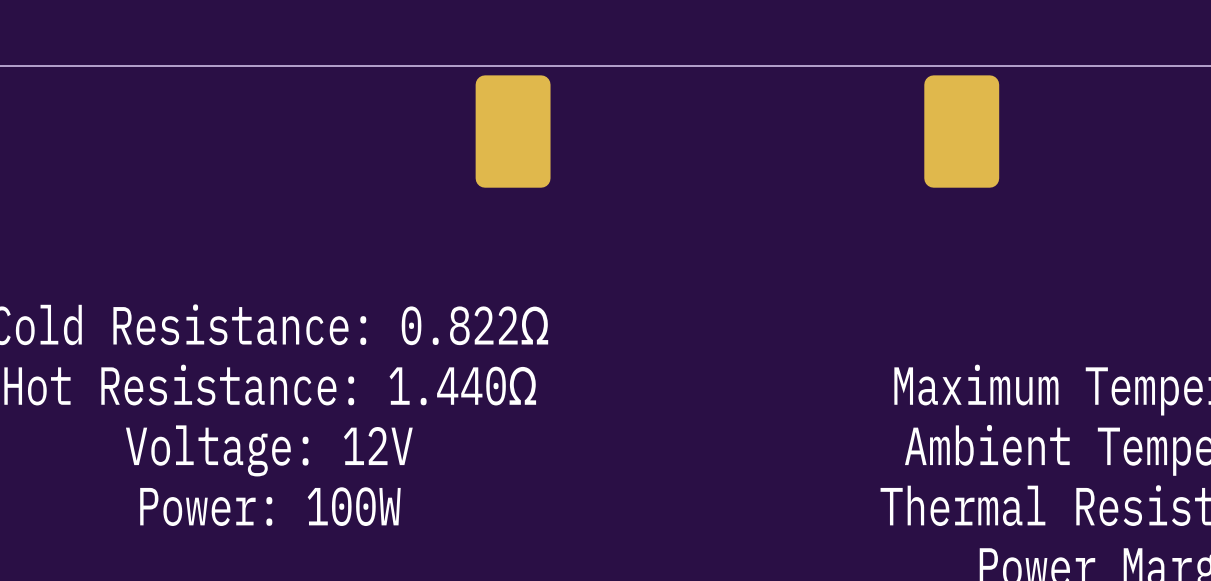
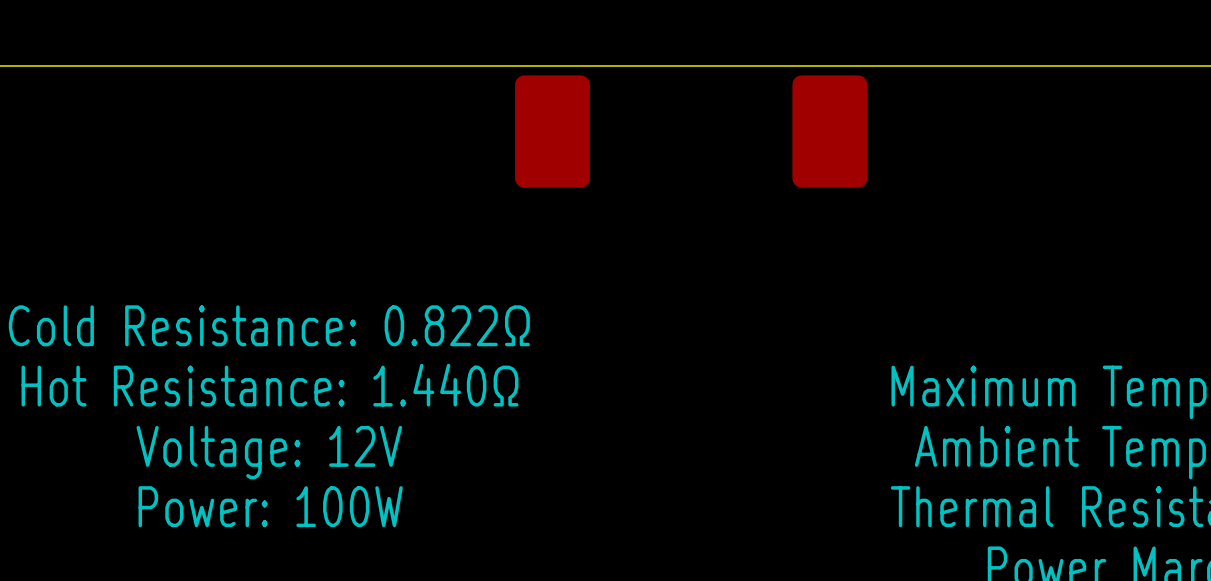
part position: (513, 131) -> (552, 131)
part position: (961, 131) -> (829, 131)

